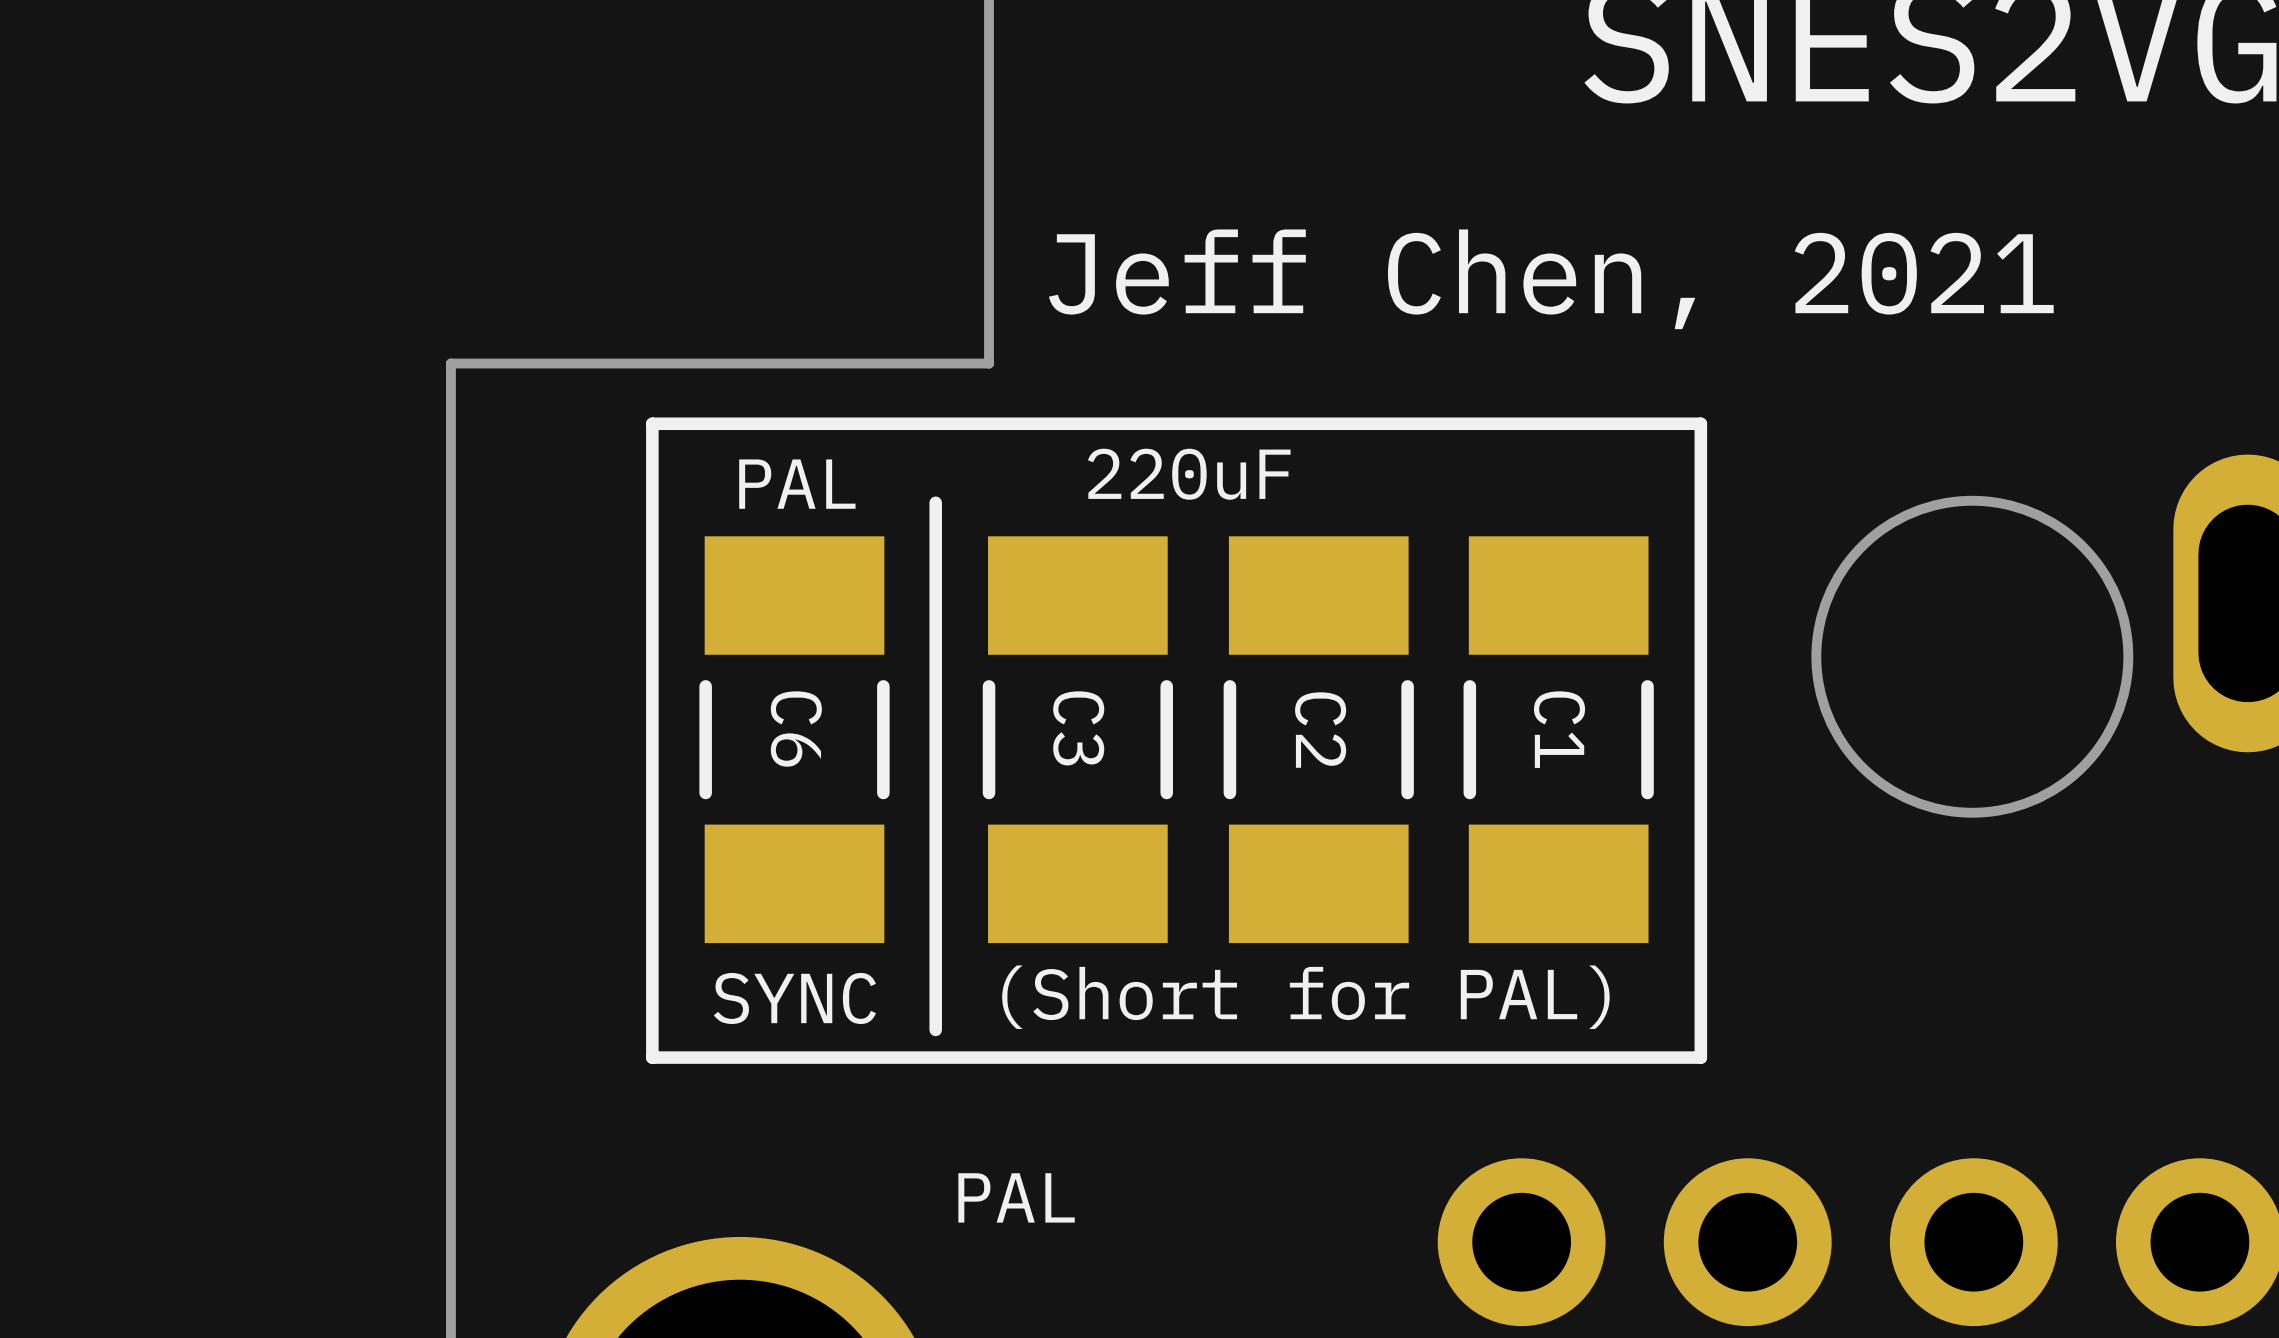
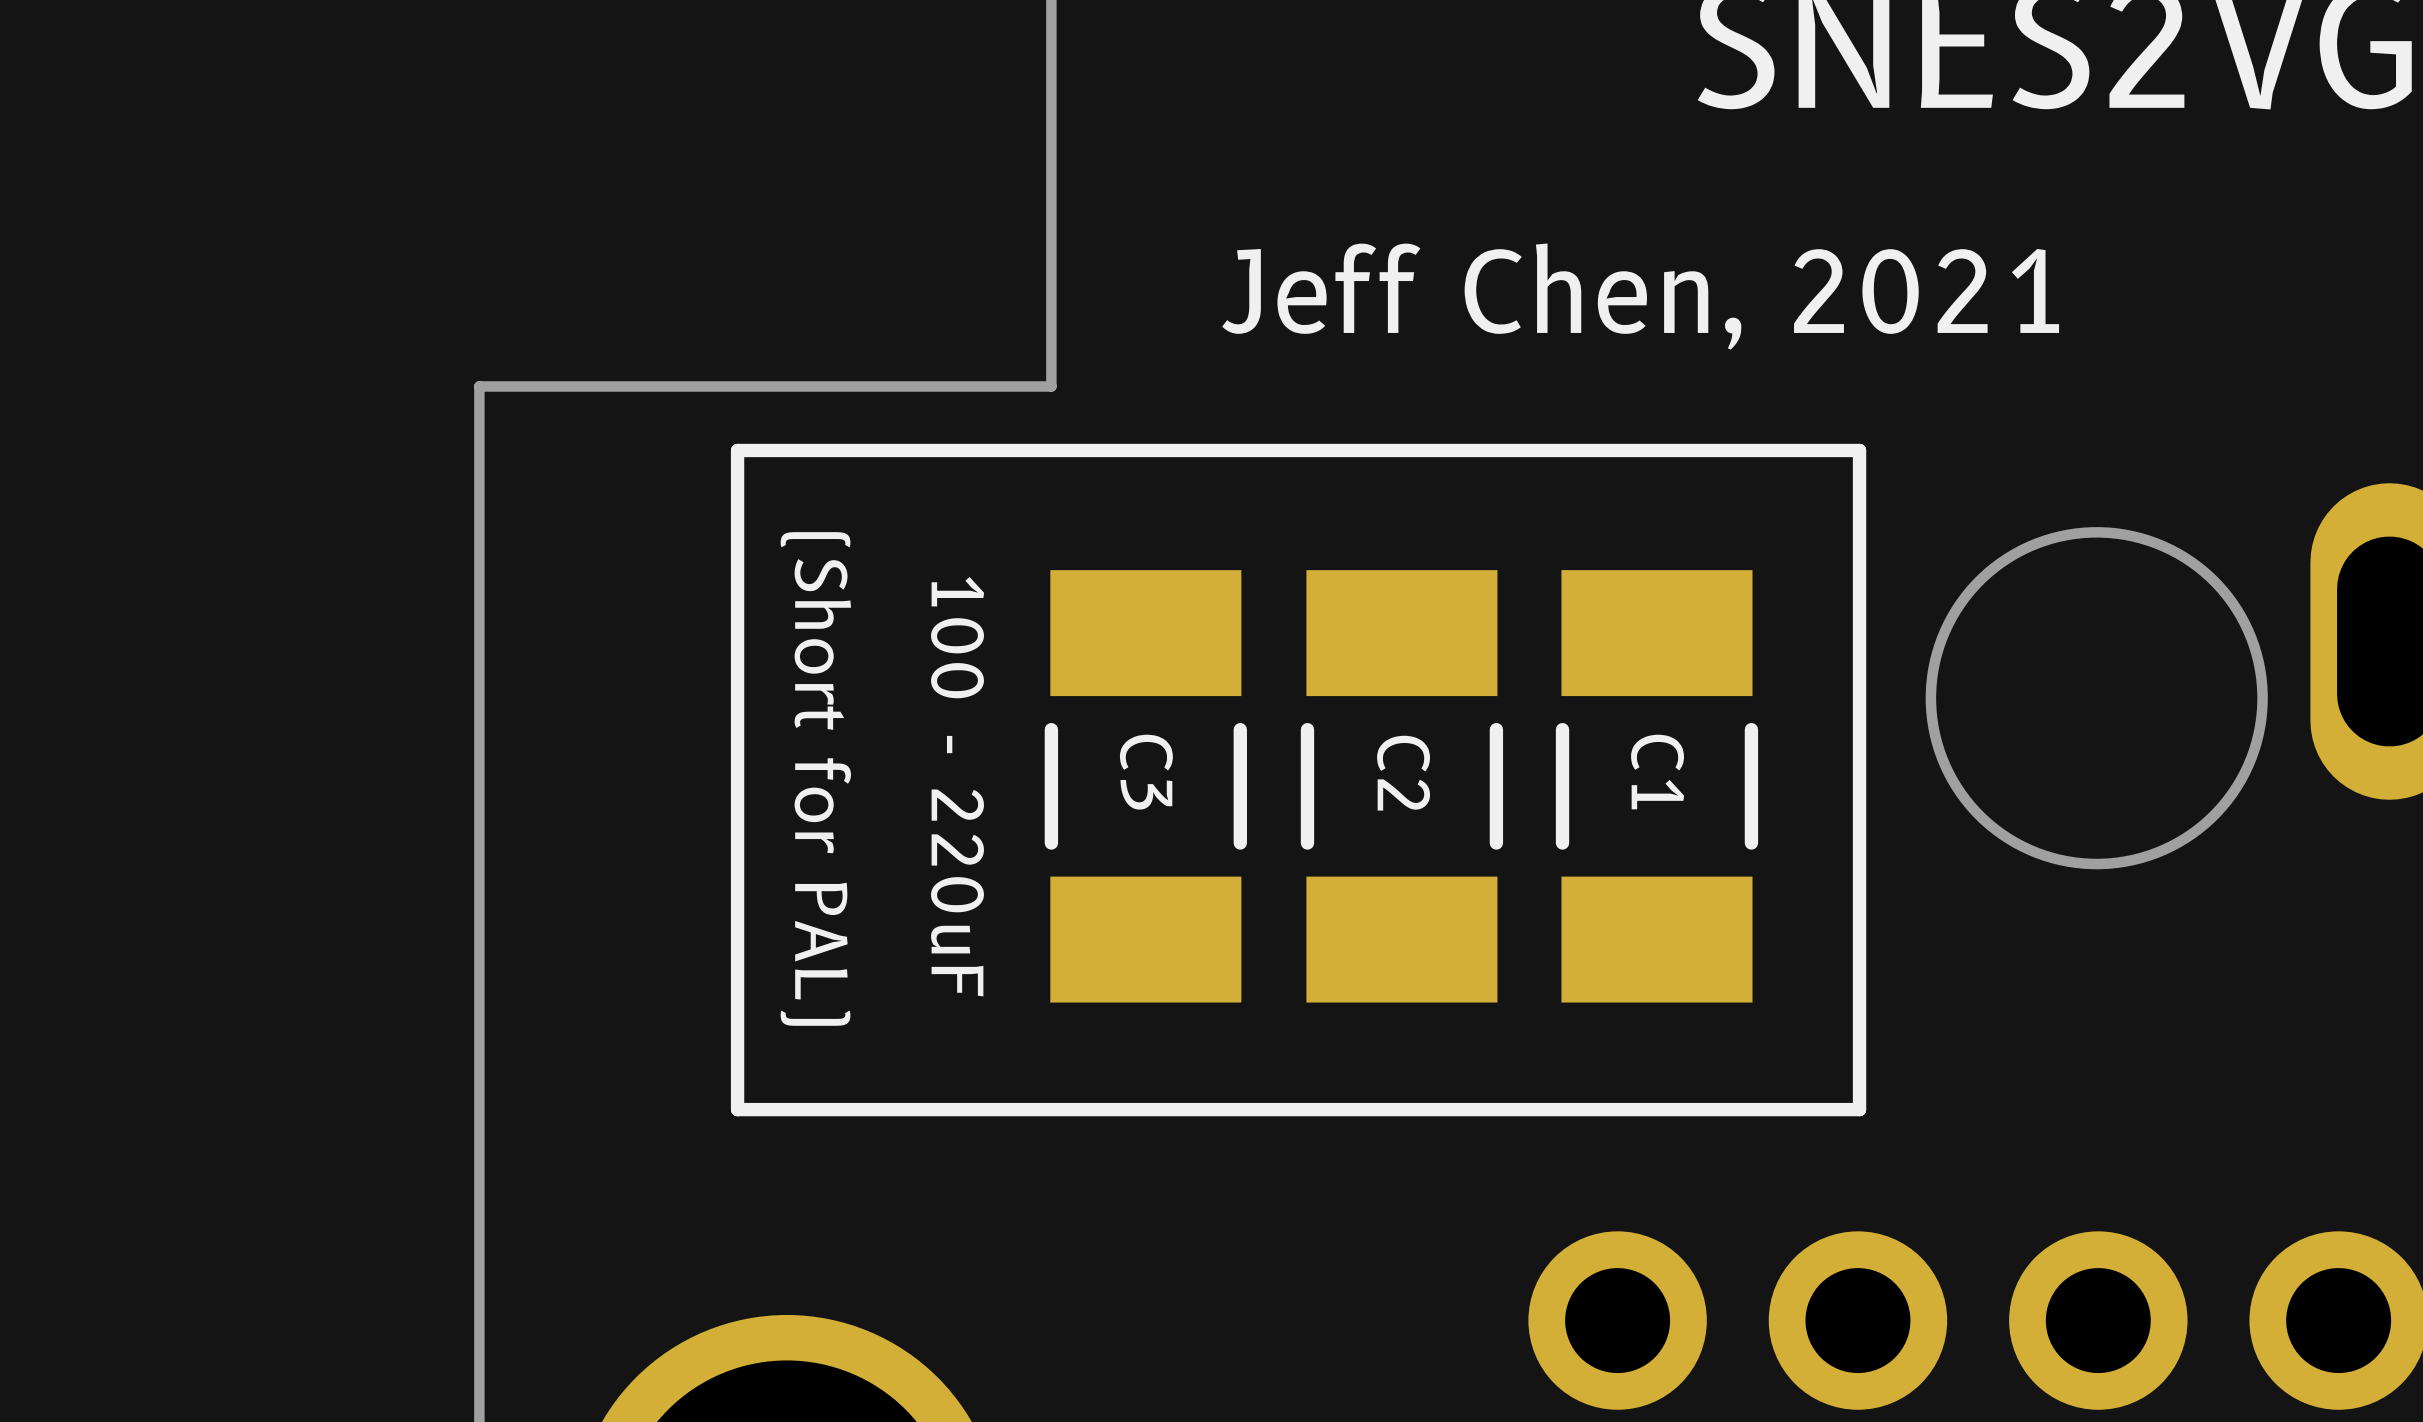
line: (1700, 423) (1700, 1057) (652, 1057) (652, 423) (693, 423) -> (1808, 450) (1859, 450) (1859, 1109) (737, 1109) (737, 450)
text: 220uF (1189, 474) -> none
text: PAL (797, 484) -> none
line: (935, 502) (935, 1029) -> none
text: none -> 100 - 220uF (957, 786)
C6: (794, 739) -> none
text rotation: 0° (1305, 997) -> 90° clockwise (815, 778)
text: SYNC (794, 998) -> none
text: PAL (1016, 1197) -> none

